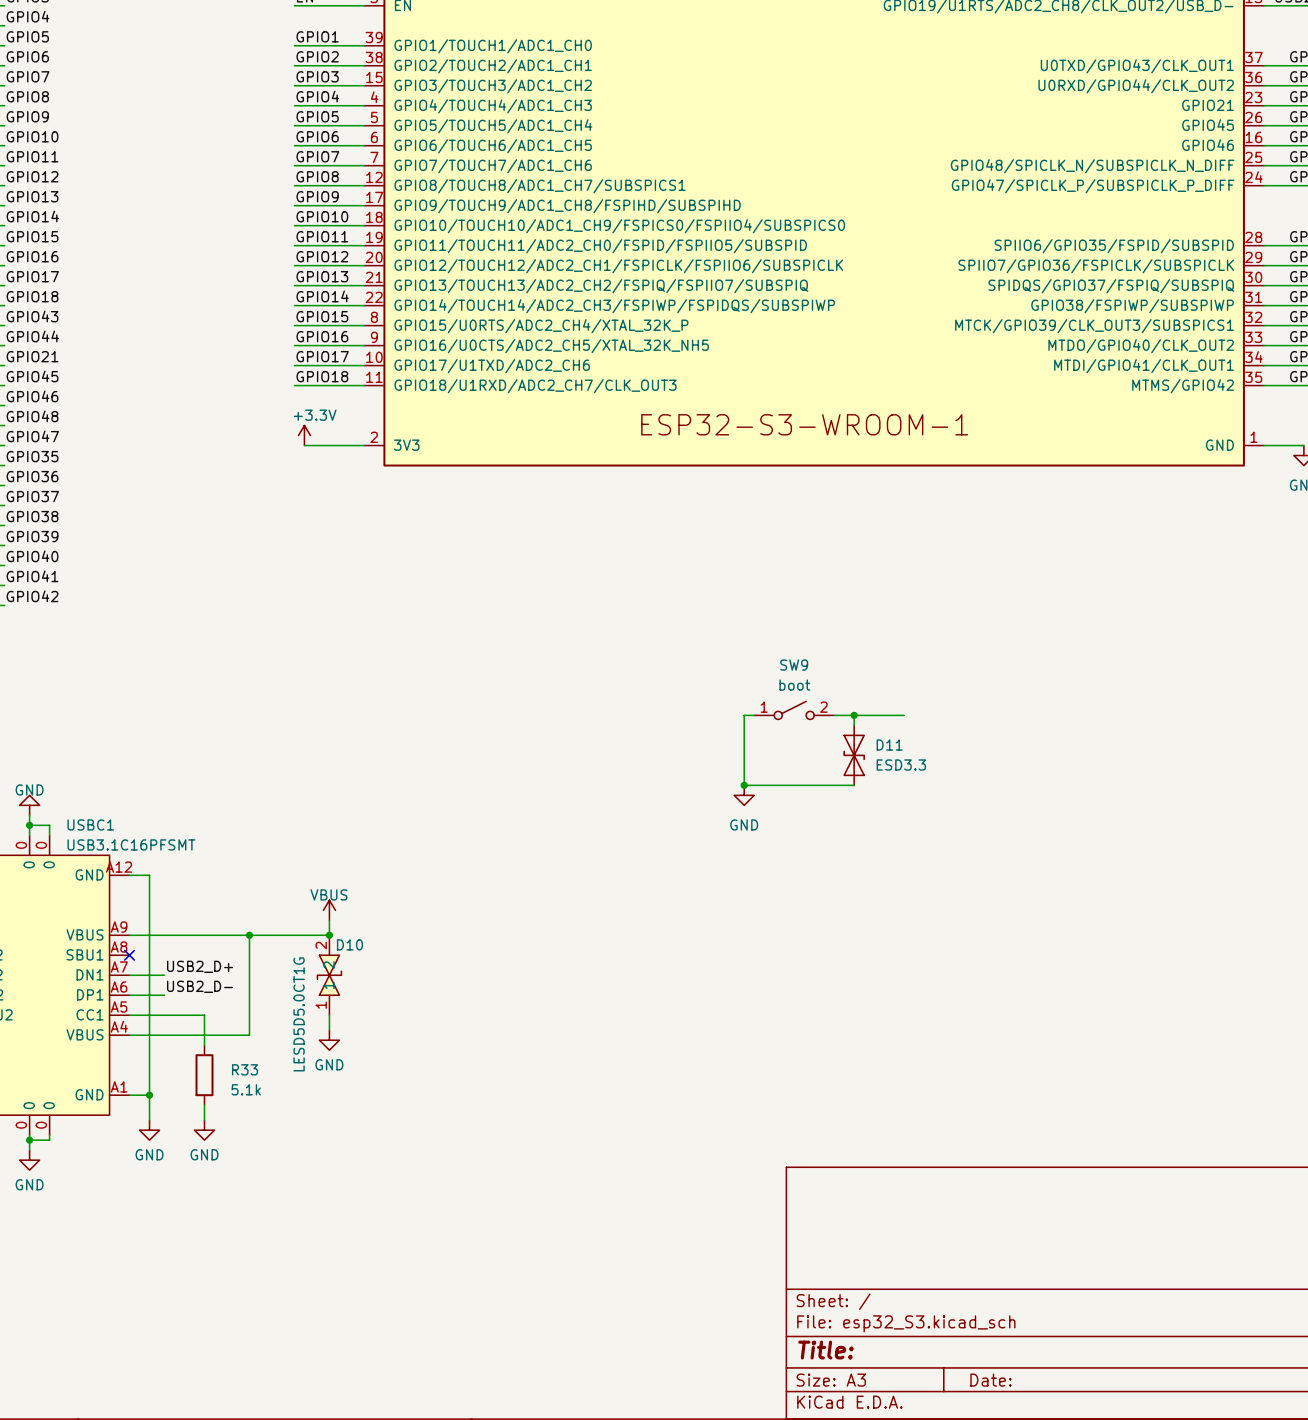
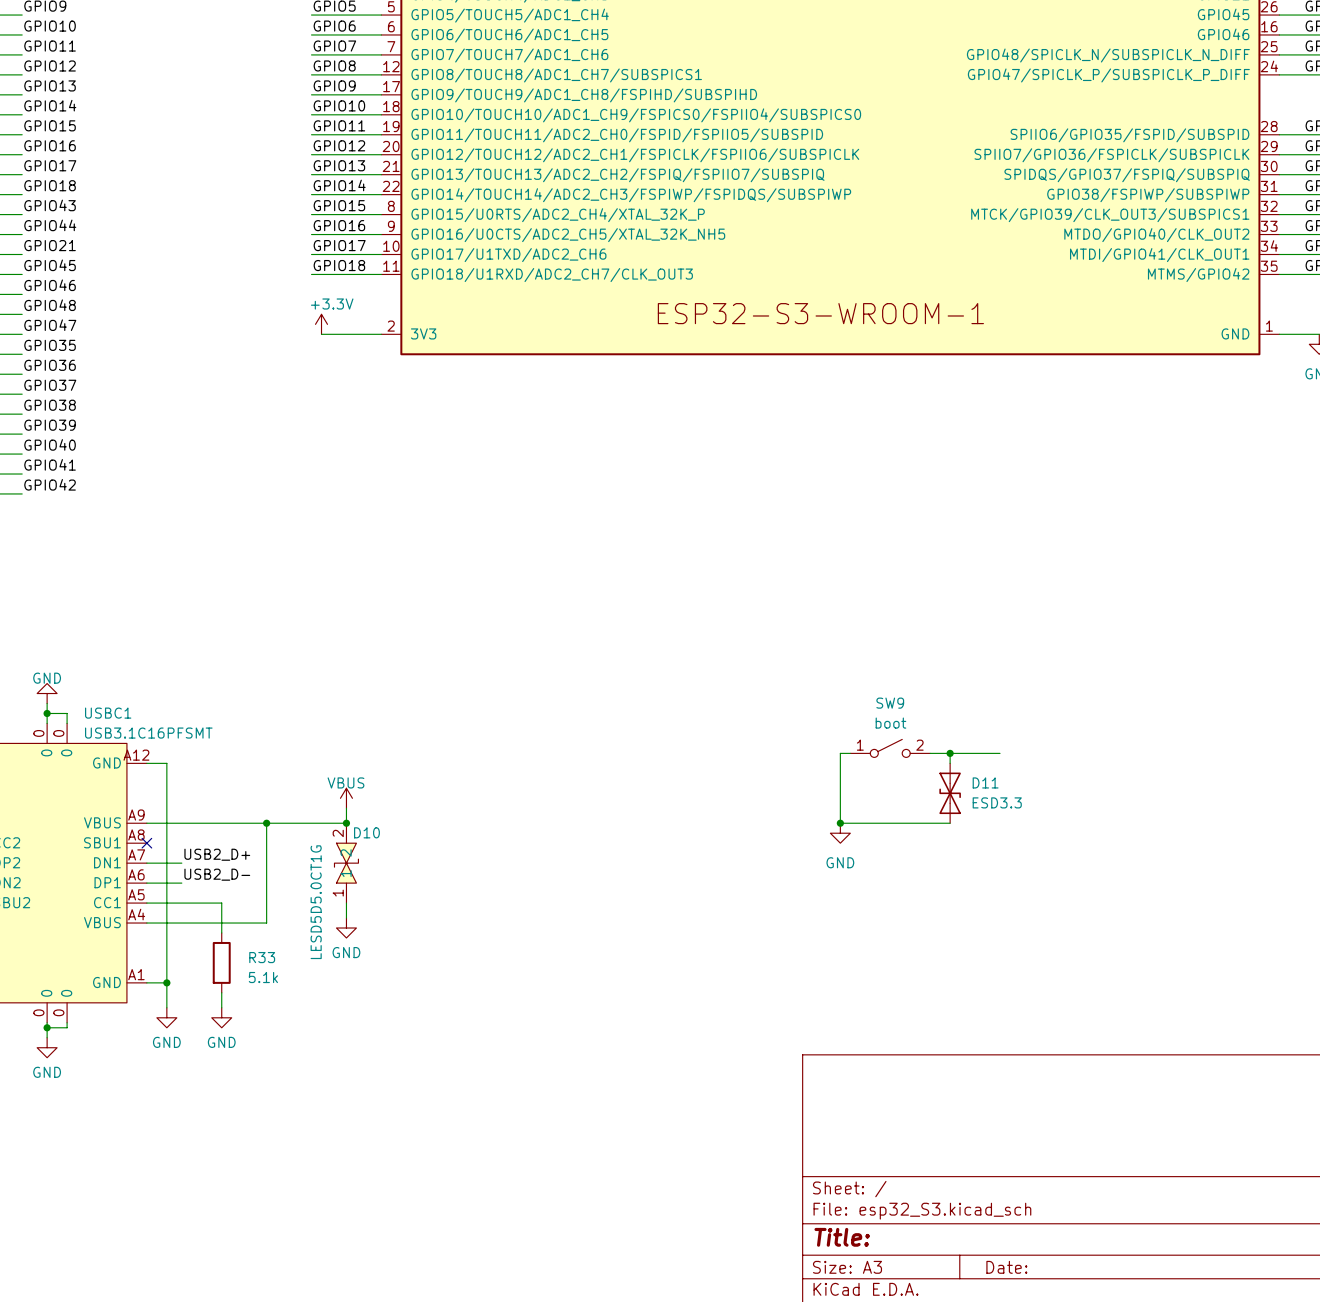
SW9 position: (794, 710) -> (890, 748)
wire: (754, 715) (744, 715) (744, 785) (854, 785) -> (850, 753) (840, 753) (840, 823) (950, 823)
wire: (834, 715) (904, 715) -> (930, 753) (1000, 753)
wire: (854, 715) (854, 725) -> (950, 753) (950, 763)
junction: (854, 715) -> none
D11 position: (854, 755) -> (950, 793)
junction: (744, 785) -> none
power symbol position: GND (744, 795) -> GND (840, 833)
junction: none -> (950, 753)
junction: none -> (840, 823)

